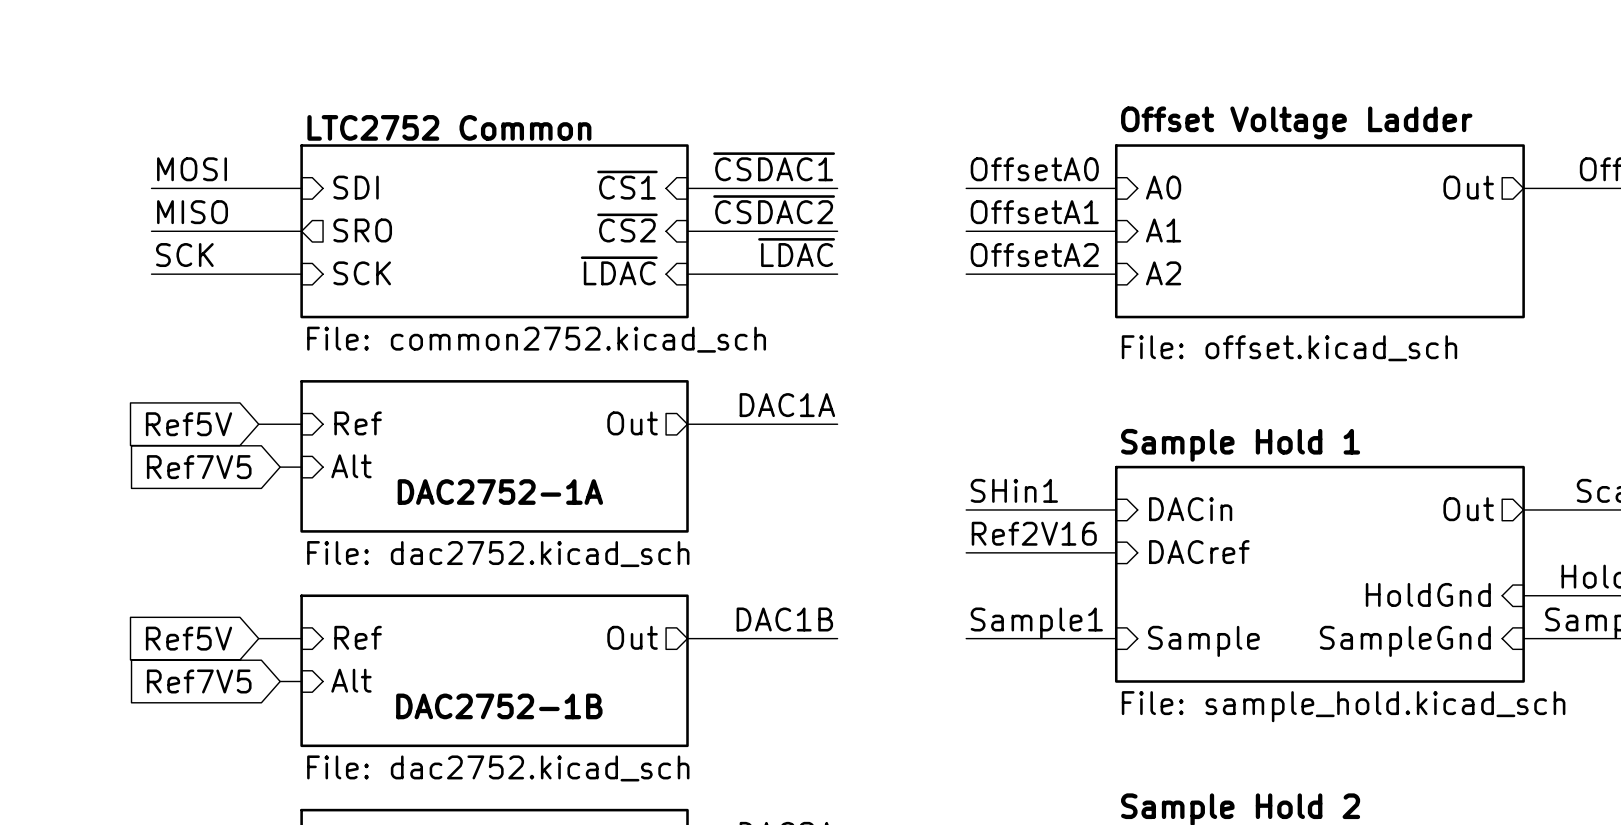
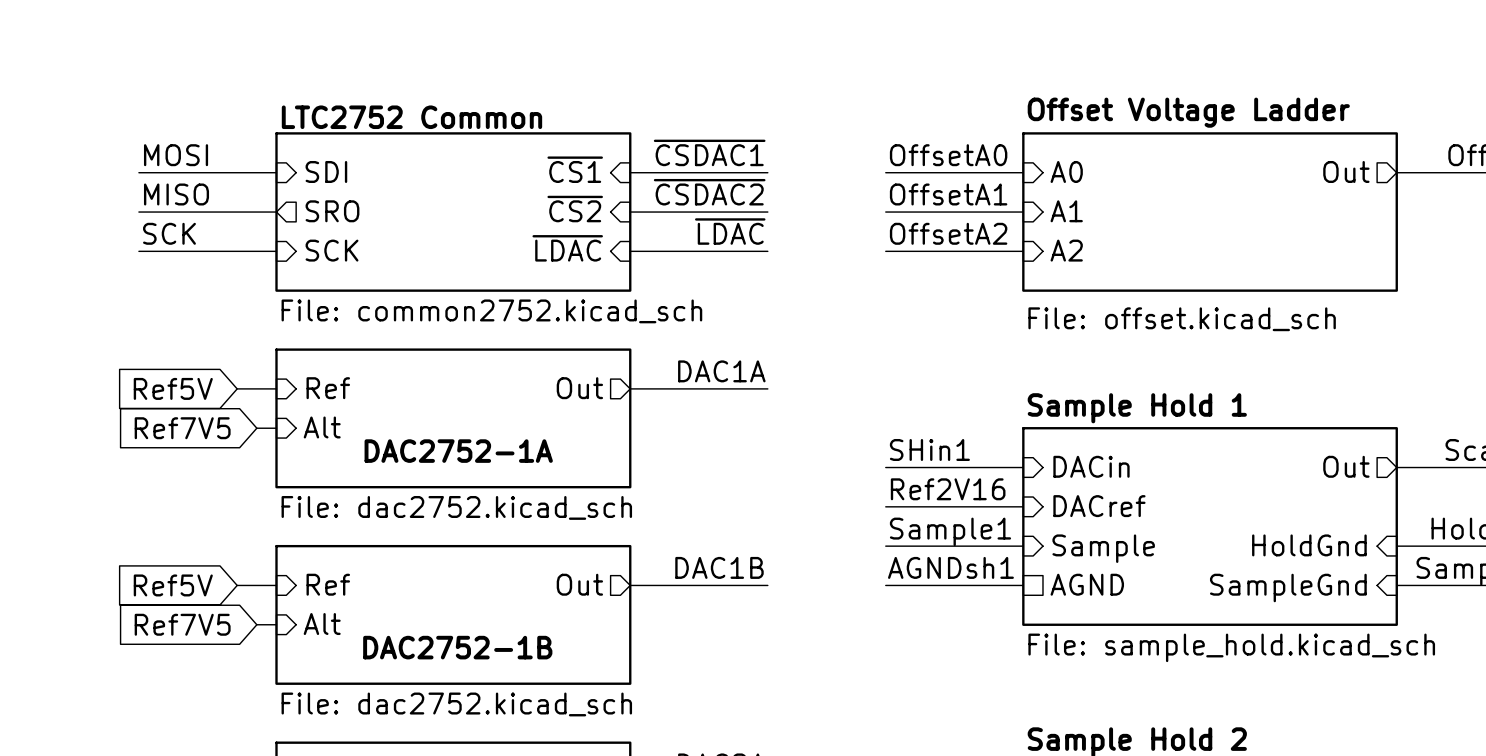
label: none -> Sample1 (950, 531)
wire: none -> (885, 546) (1023, 546)
sheet pin: none -> Sample (1103, 548)
label: Sample1 (1036, 623) -> AGNDsh1 (950, 567)
sheet pin shape: input (1203, 641) -> passive (1087, 584)
sheet pin: Sample (1203, 641) -> AGND (1087, 584)

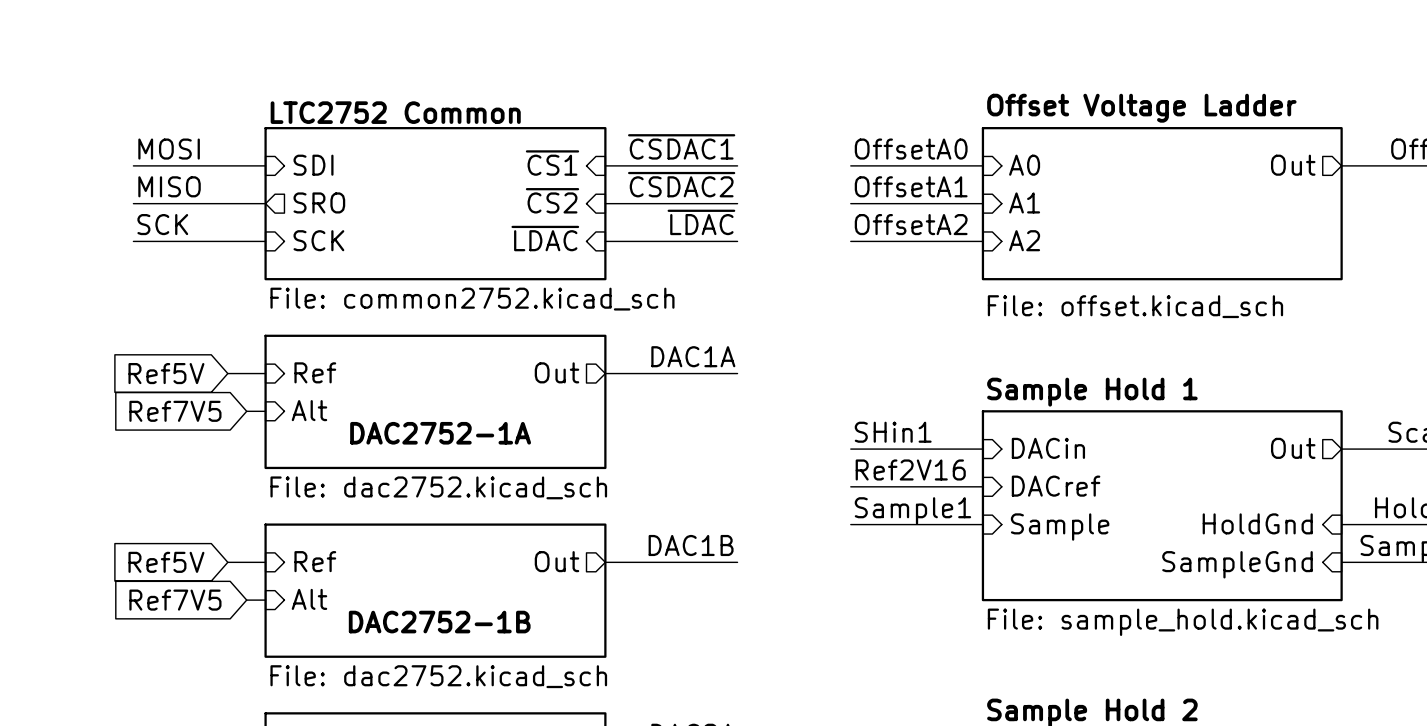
label: AGNDsh1 (950, 567) -> none
sheet pin: AGND (1087, 584) -> none
wire: (885, 585) (1023, 585) -> none

